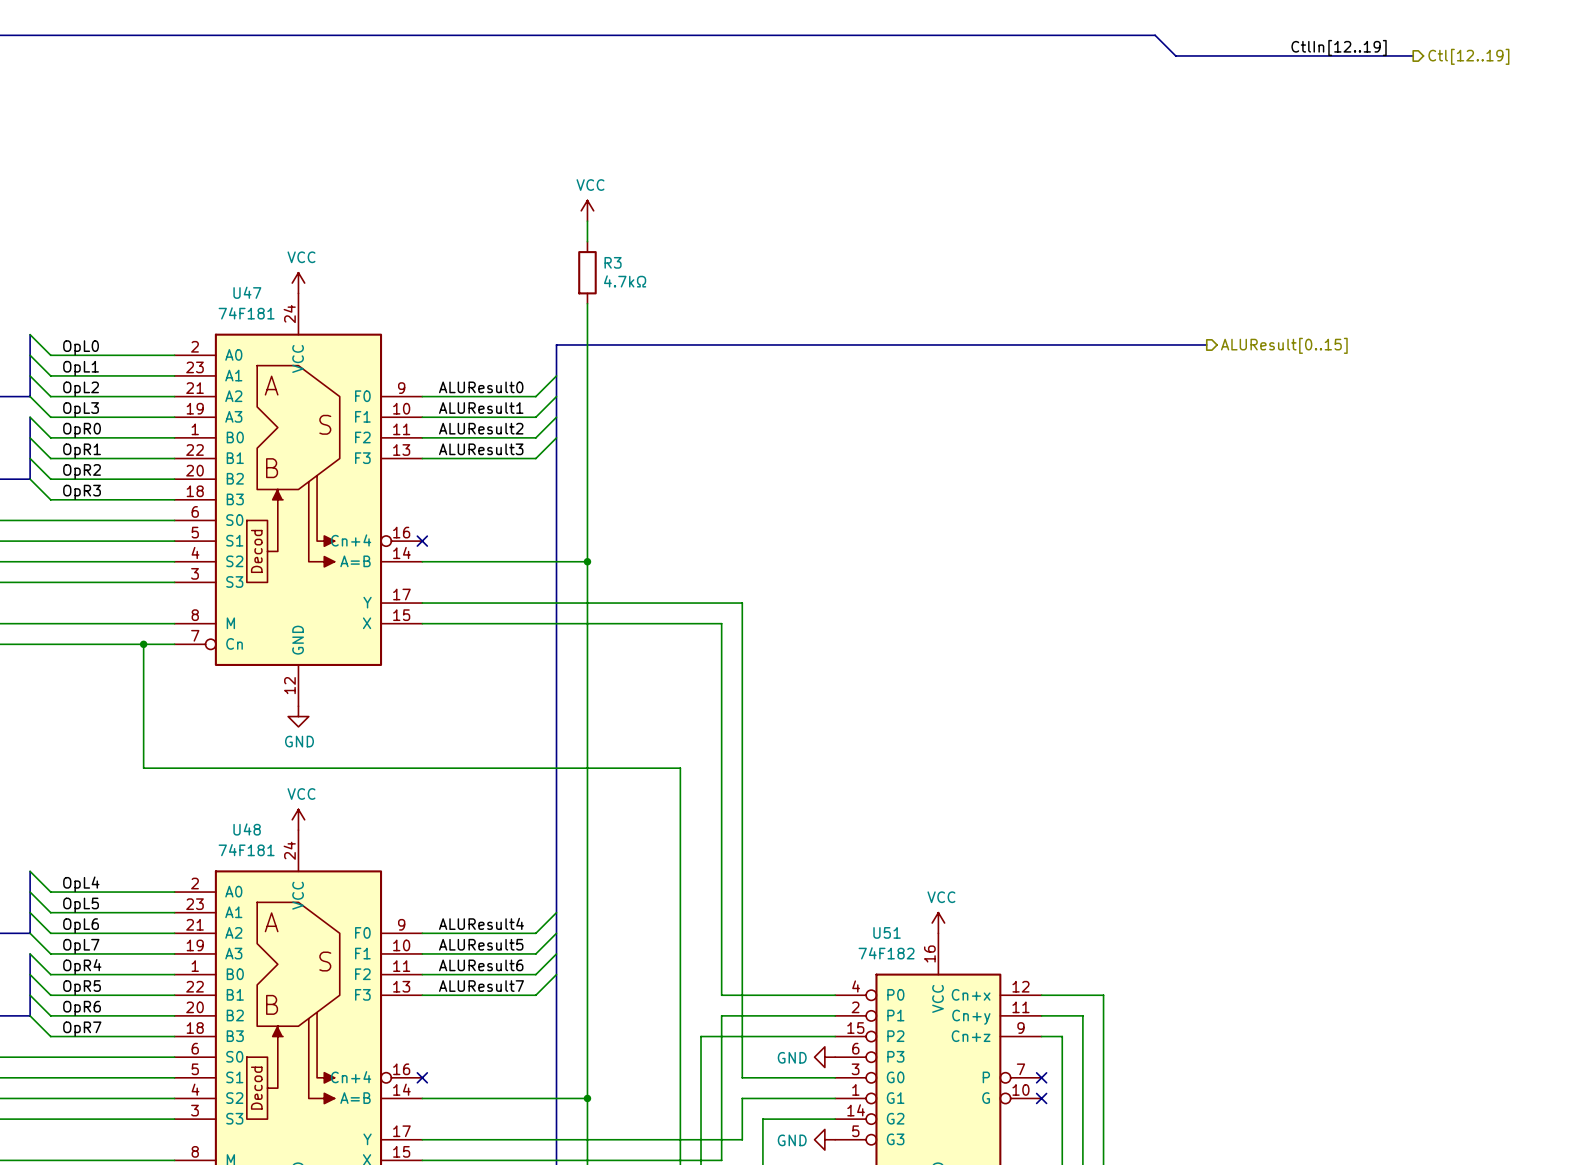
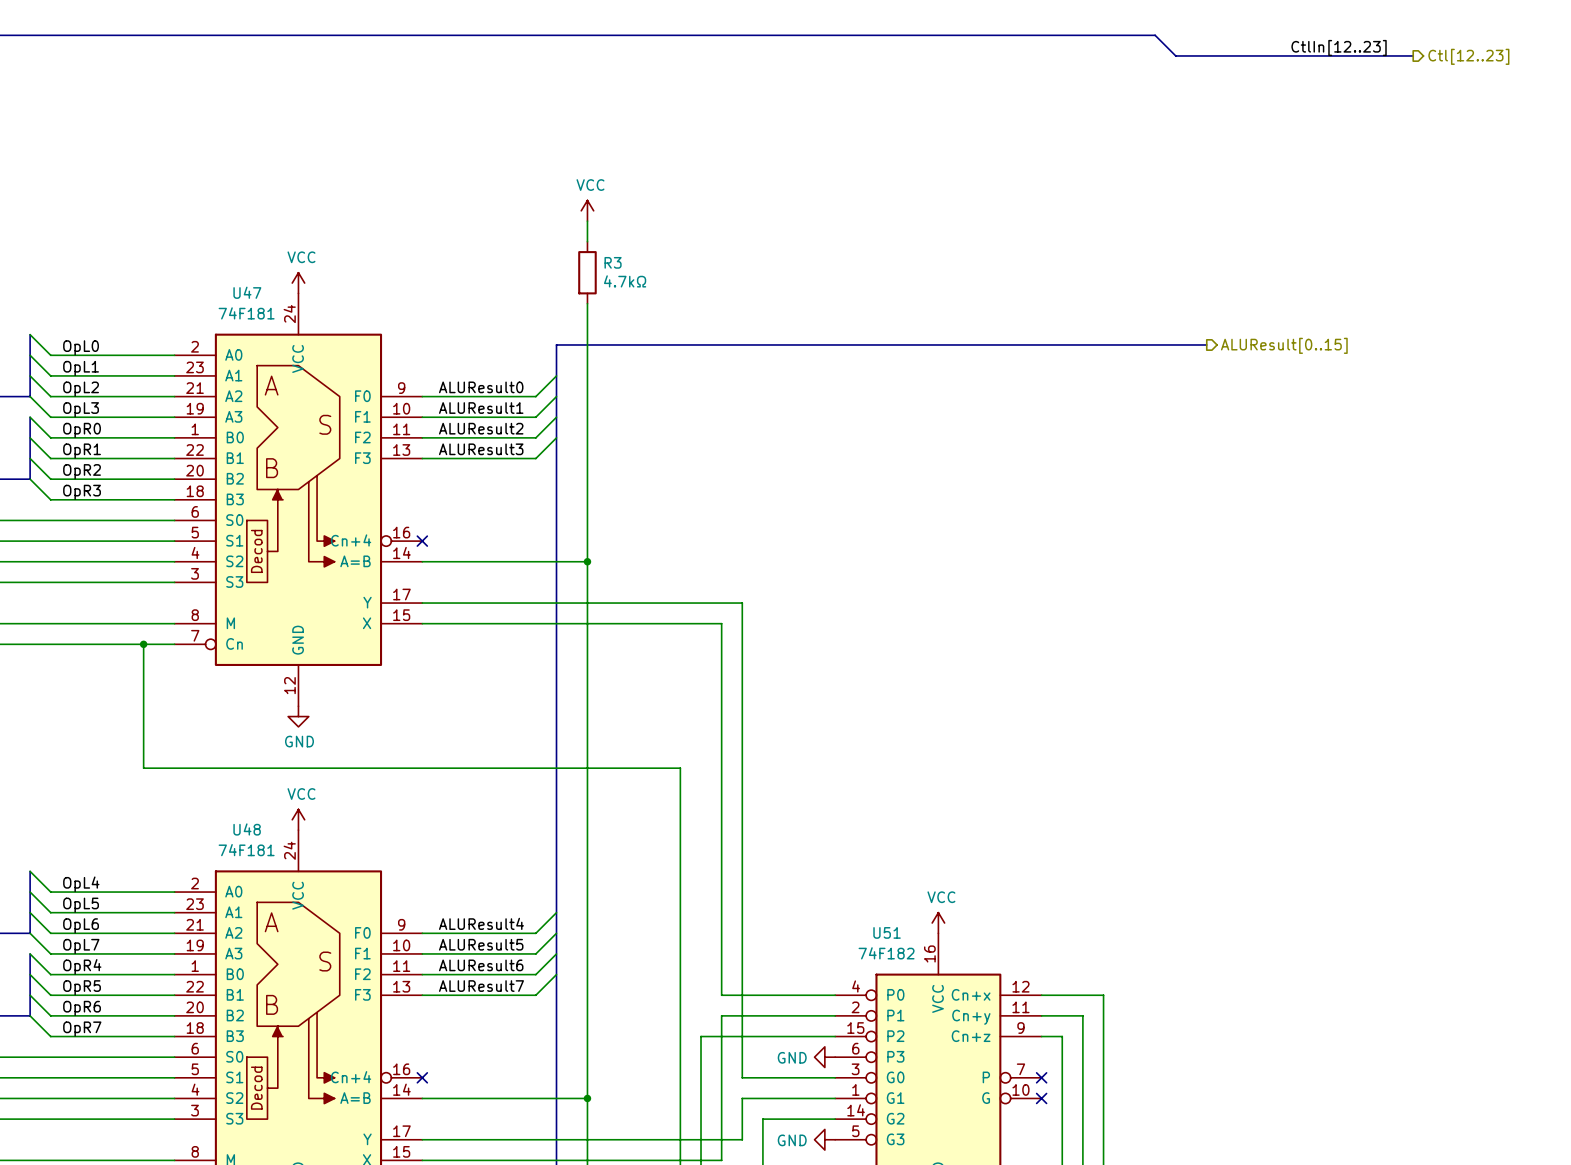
label: CtlIn[12..19] (1339, 48) -> CtlIn[12..23] (1339, 48)
hierarchical label: Ctl[12..19] (1468, 56) -> Ctl[12..23] (1468, 56)

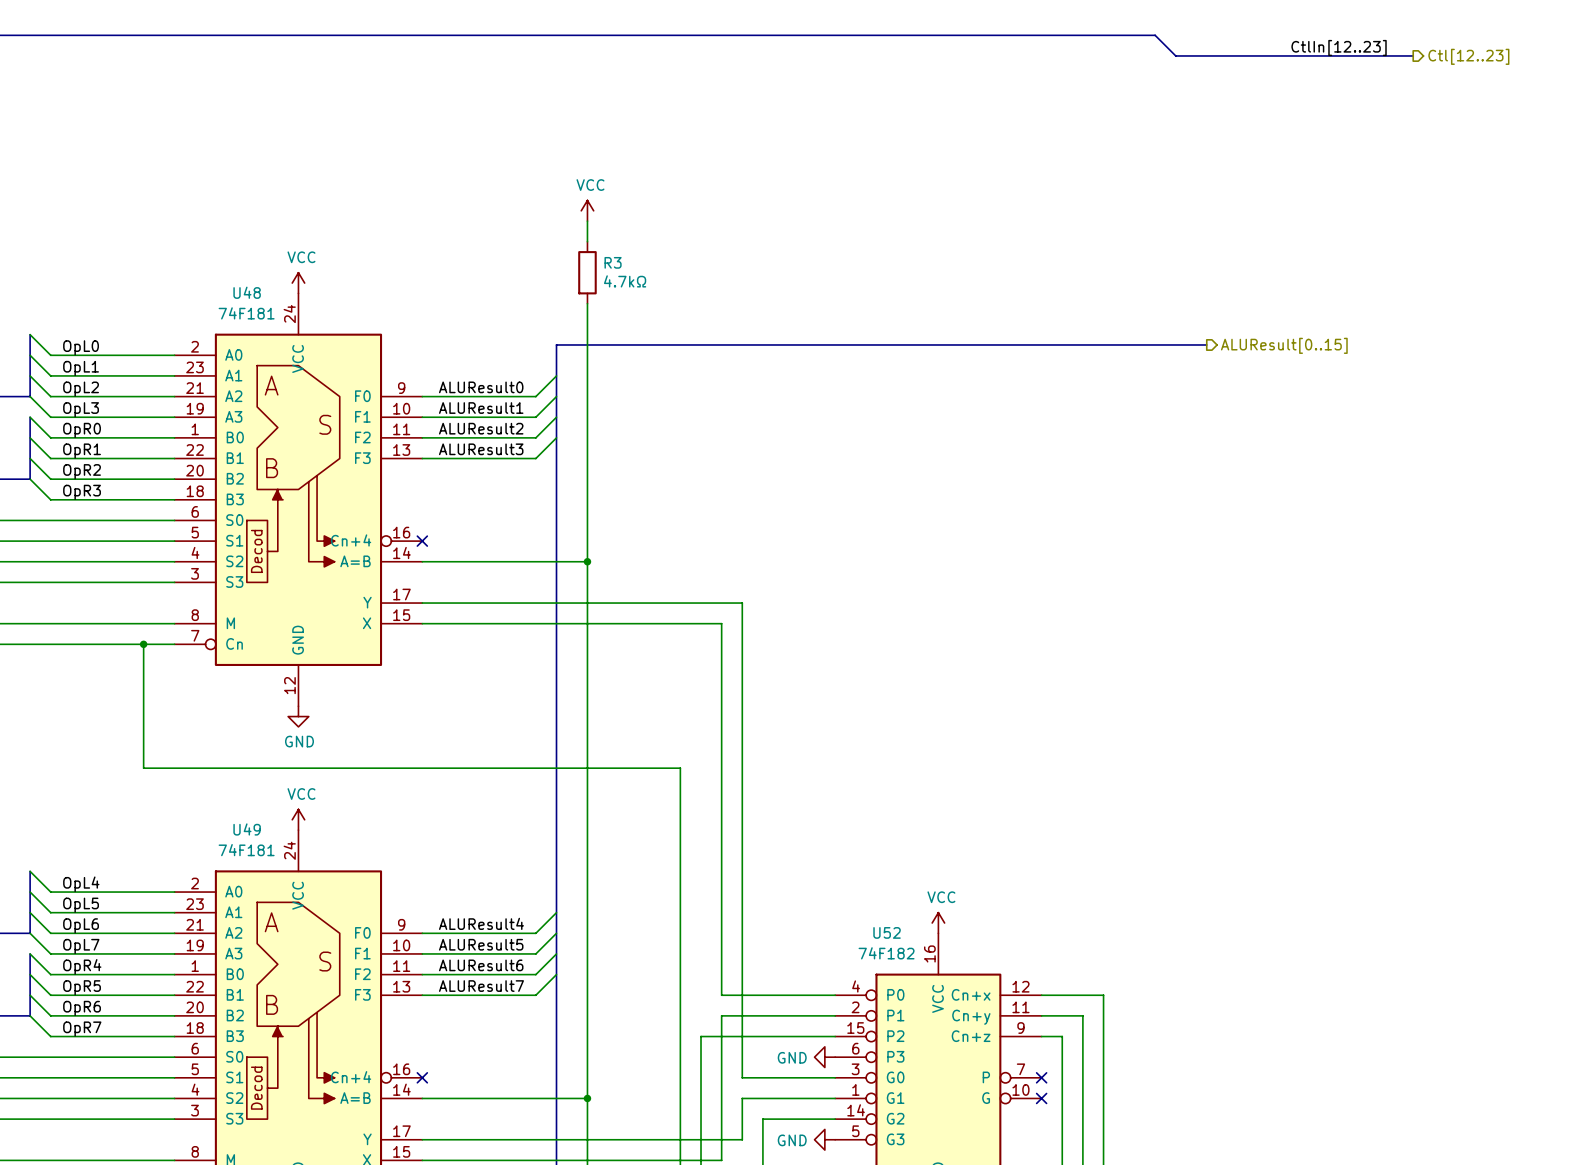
U47 name: U47 (247, 292) -> U48 (247, 292)
U48 name: U48 (247, 829) -> U49 (247, 829)
U51 name: U51 (887, 932) -> U52 (887, 932)

